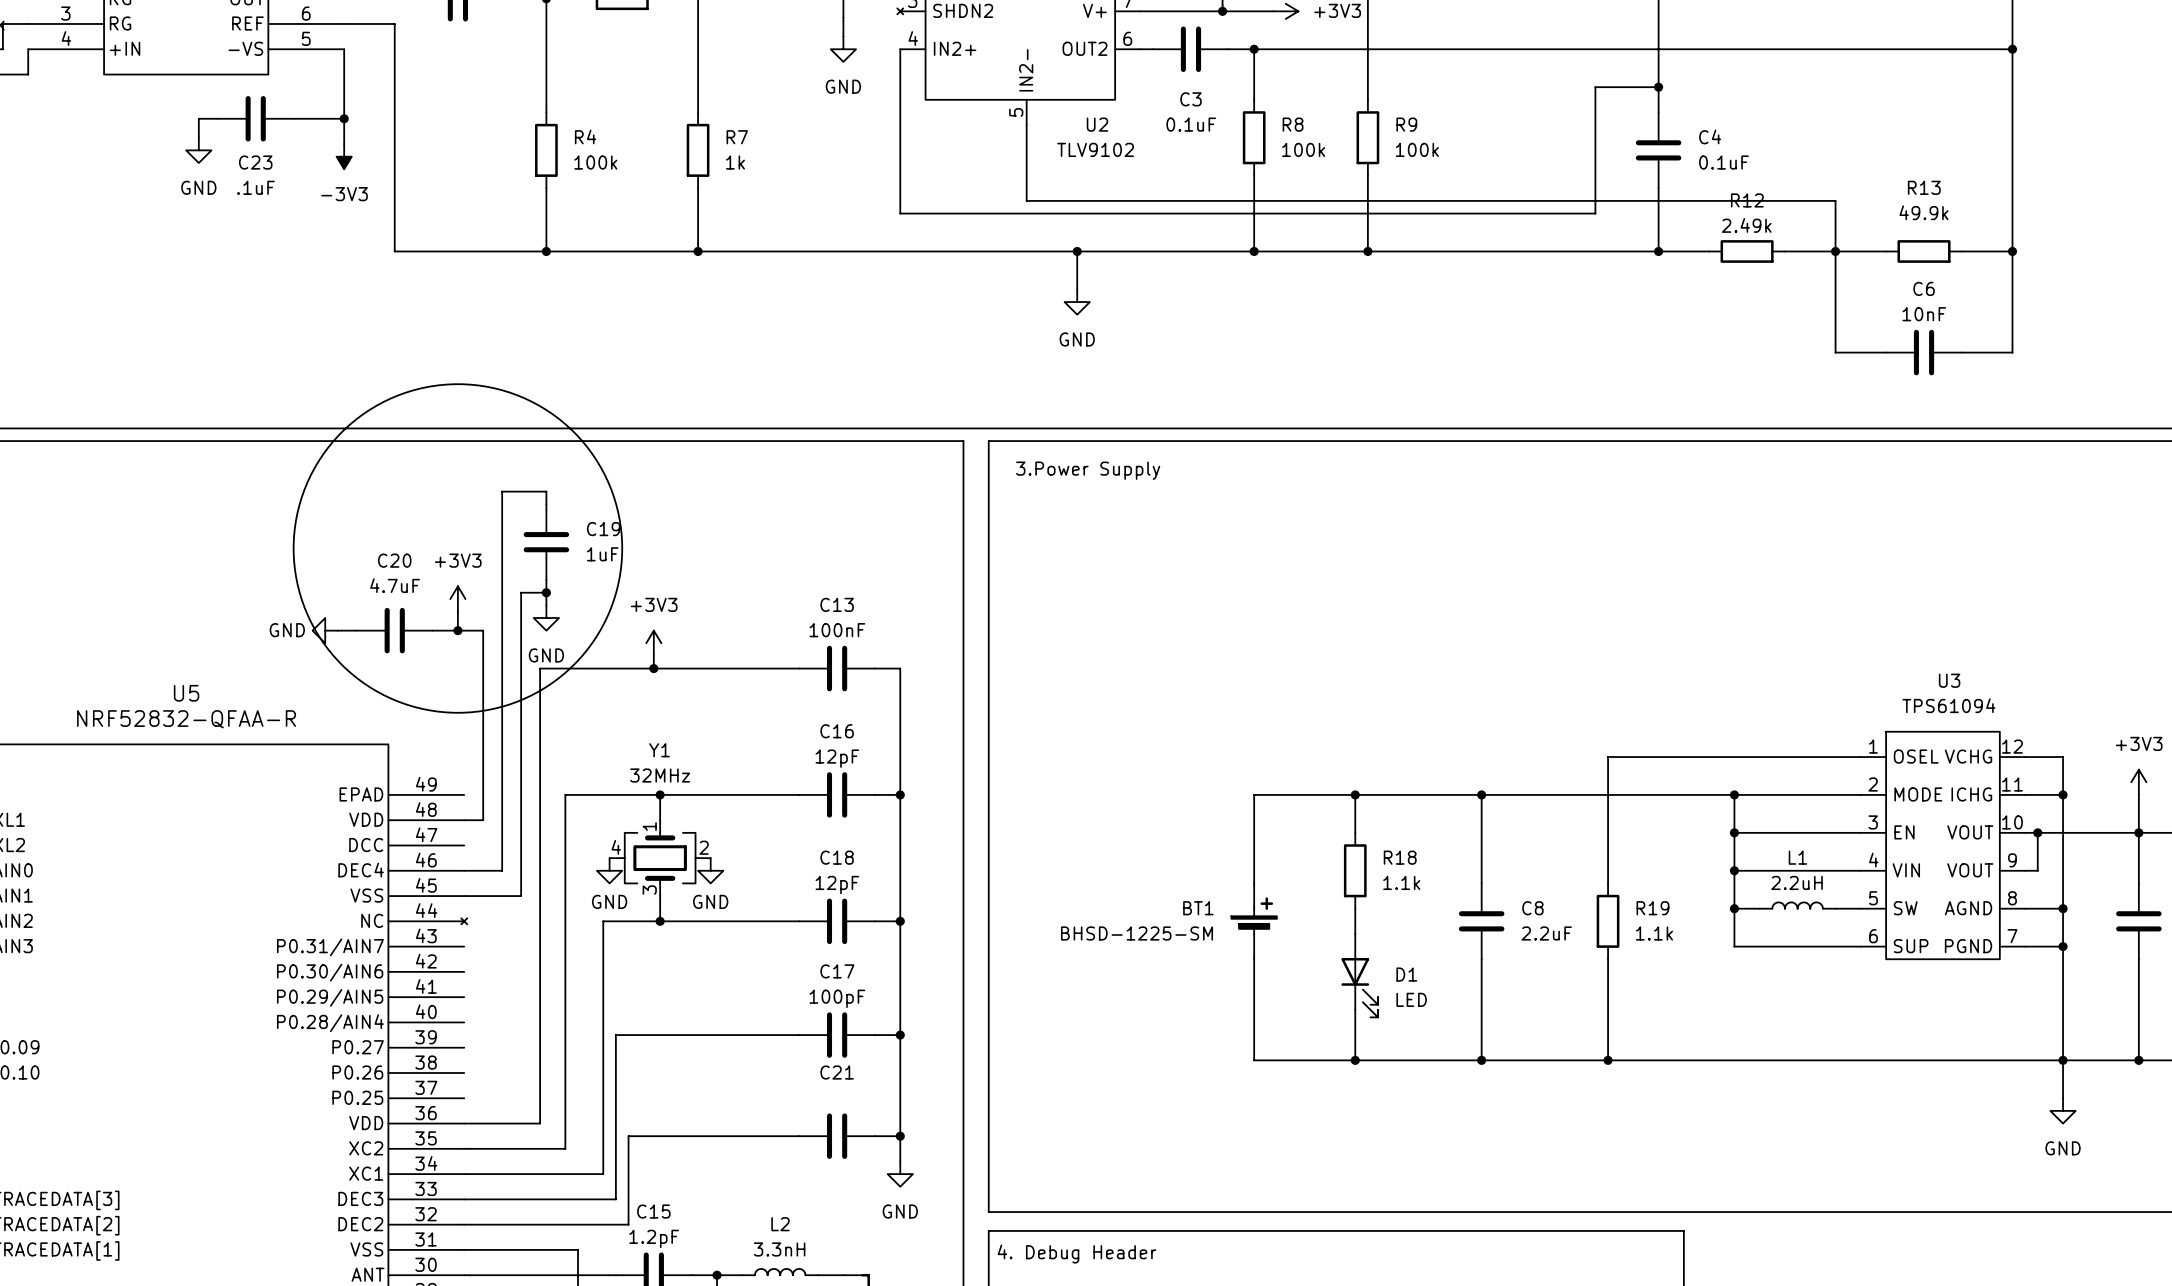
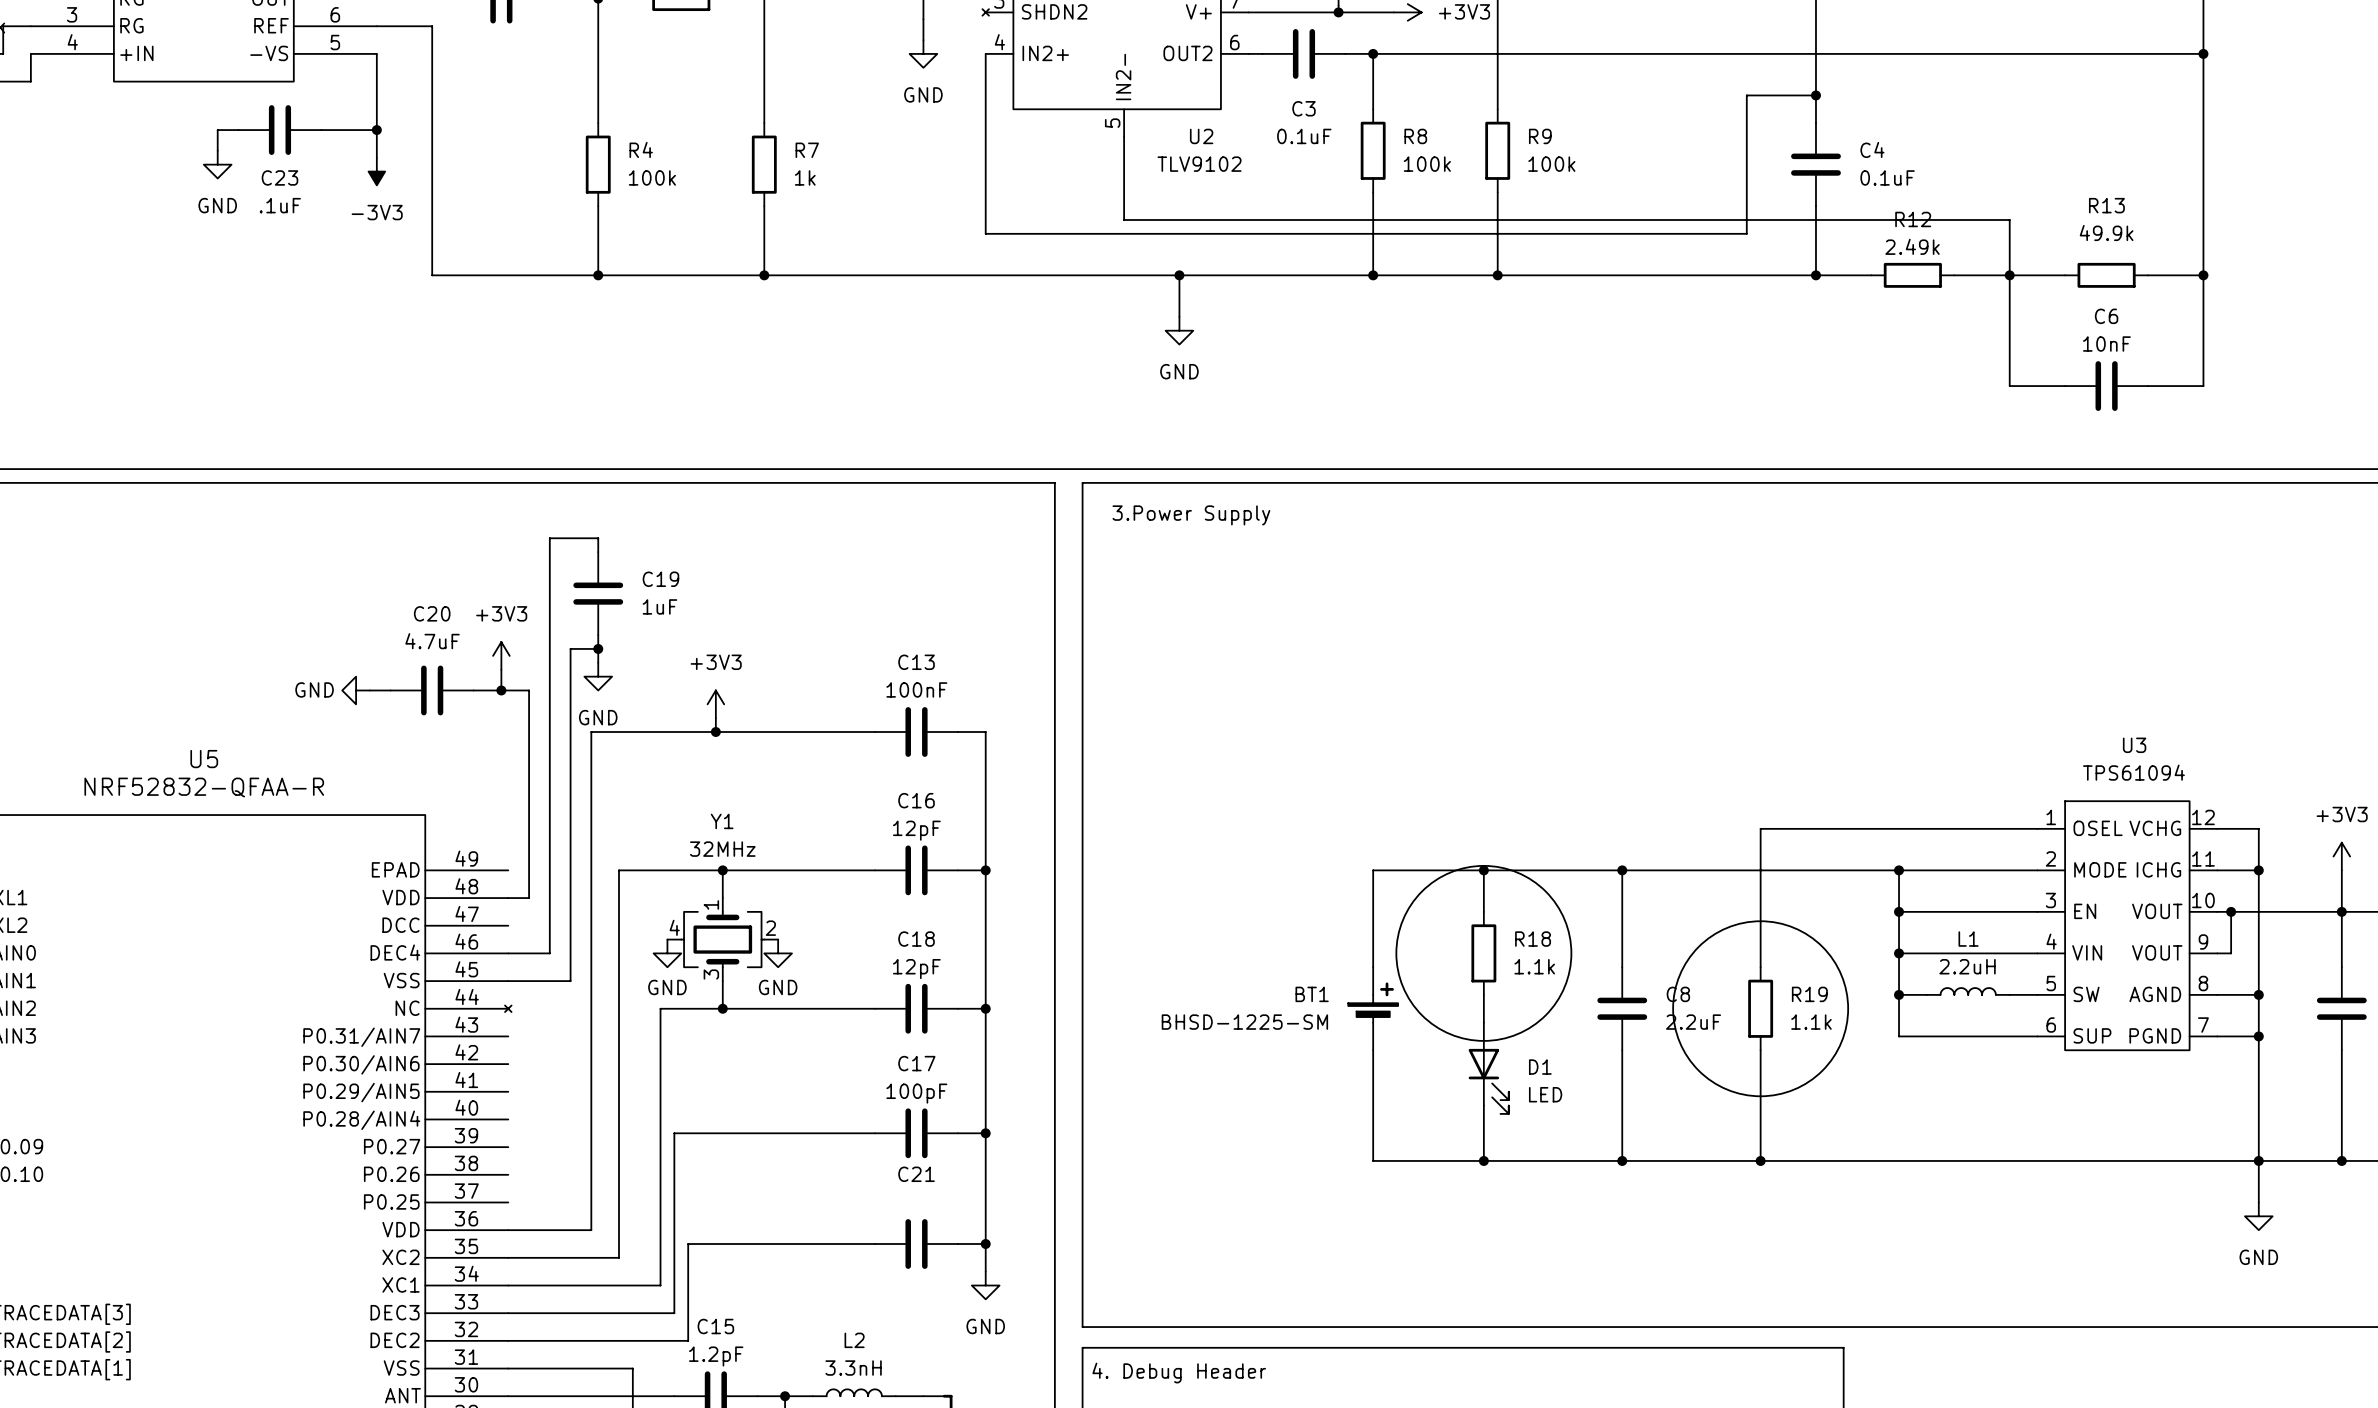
drawing: [293, 384, 623, 713] -> none
drawing: none -> [1396, 865, 1572, 1041]
drawing: none -> [1673, 921, 1849, 1097]

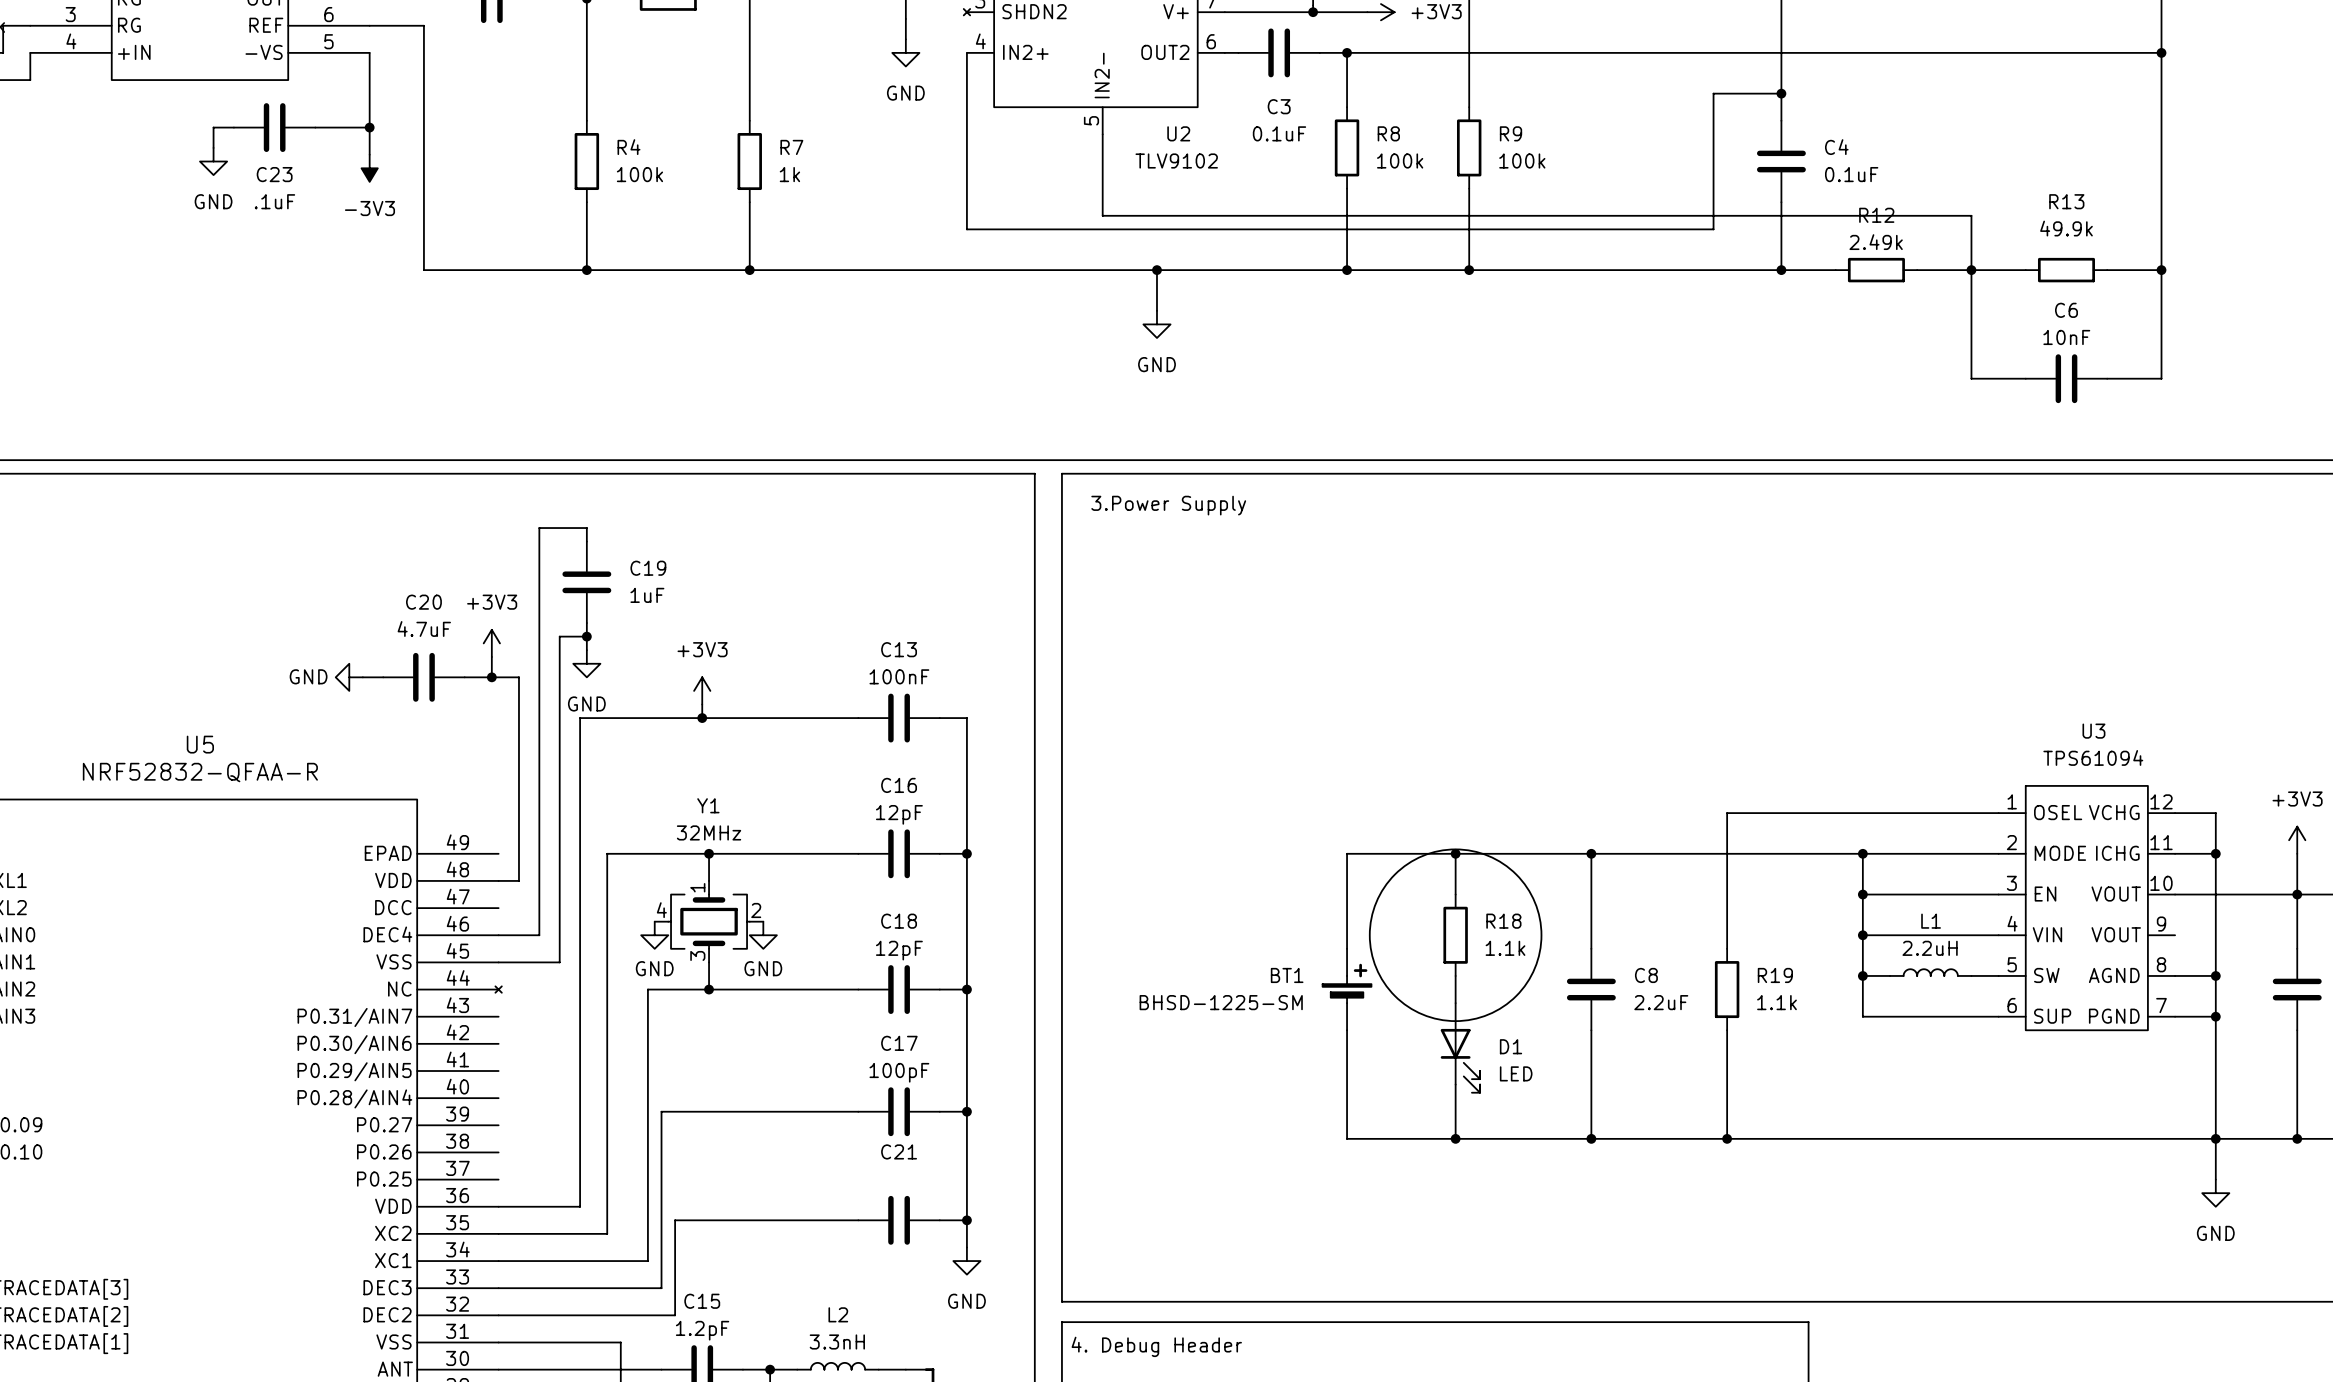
wire: (2231, 911) (2231, 953) (2217, 953) -> none
junction: (2231, 911) -> none
drawing: [1673, 921, 1849, 1097] -> none

